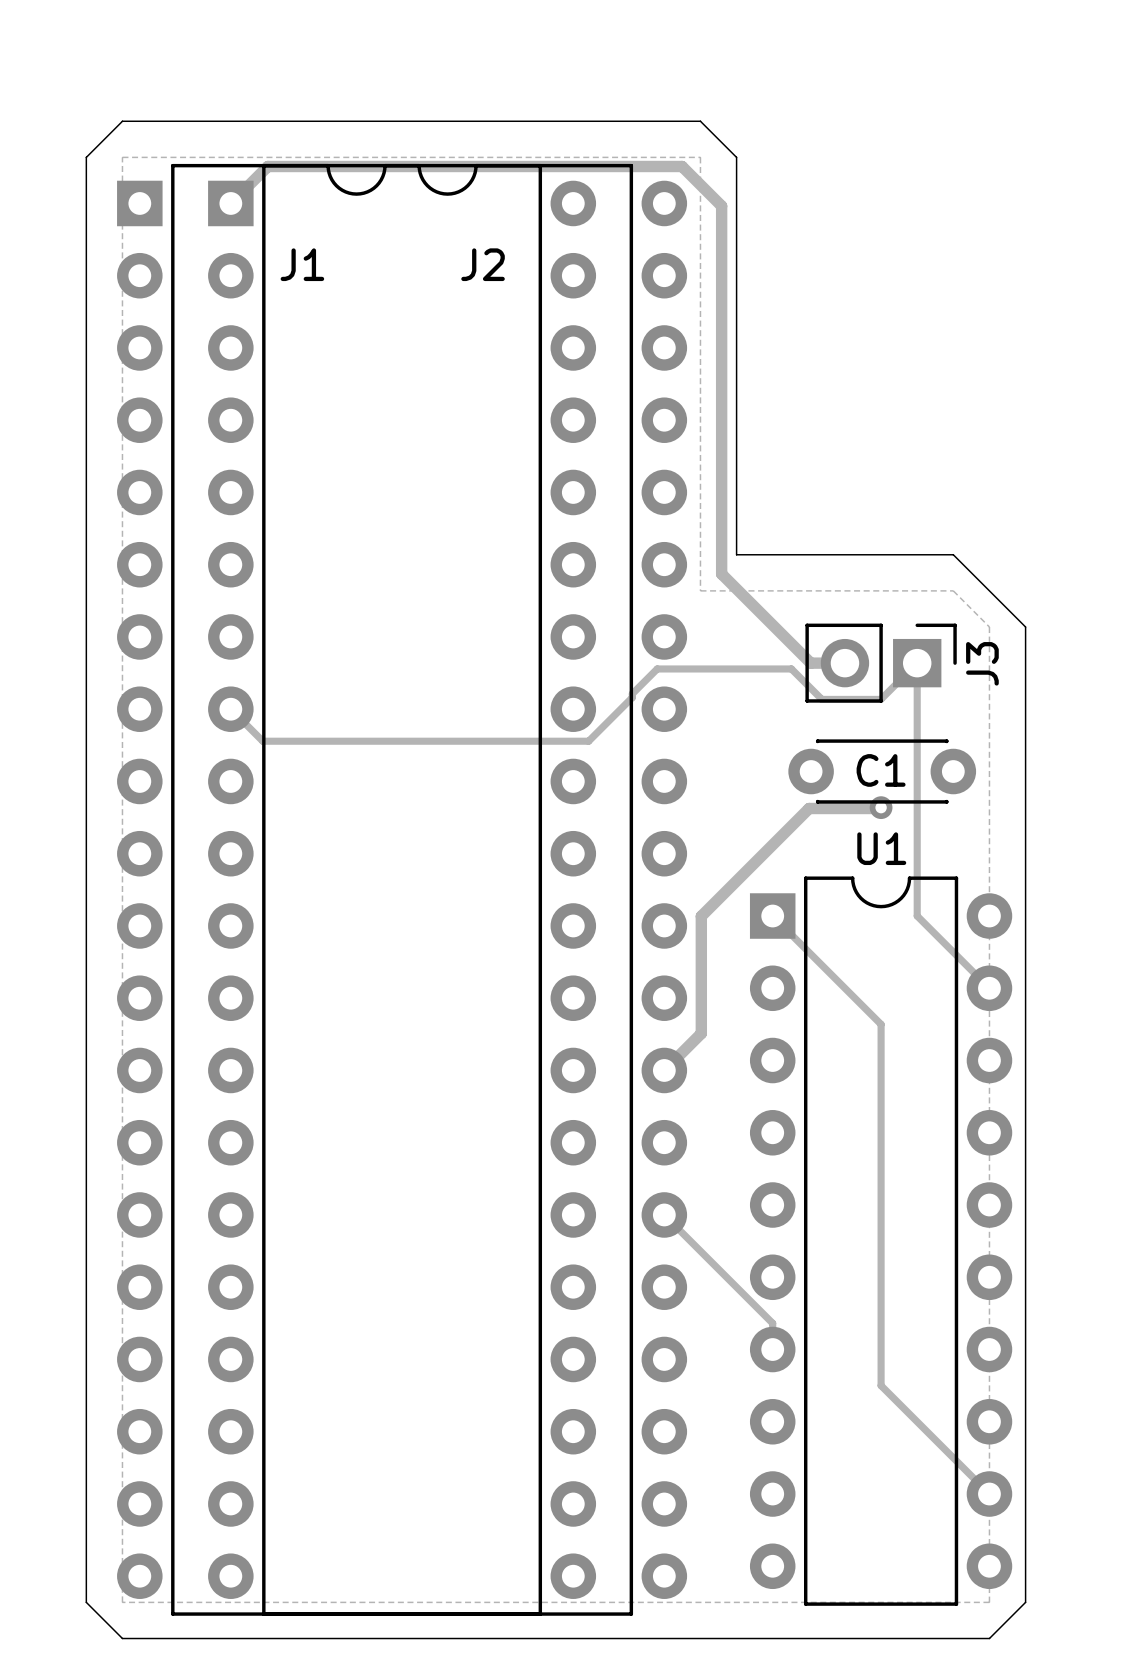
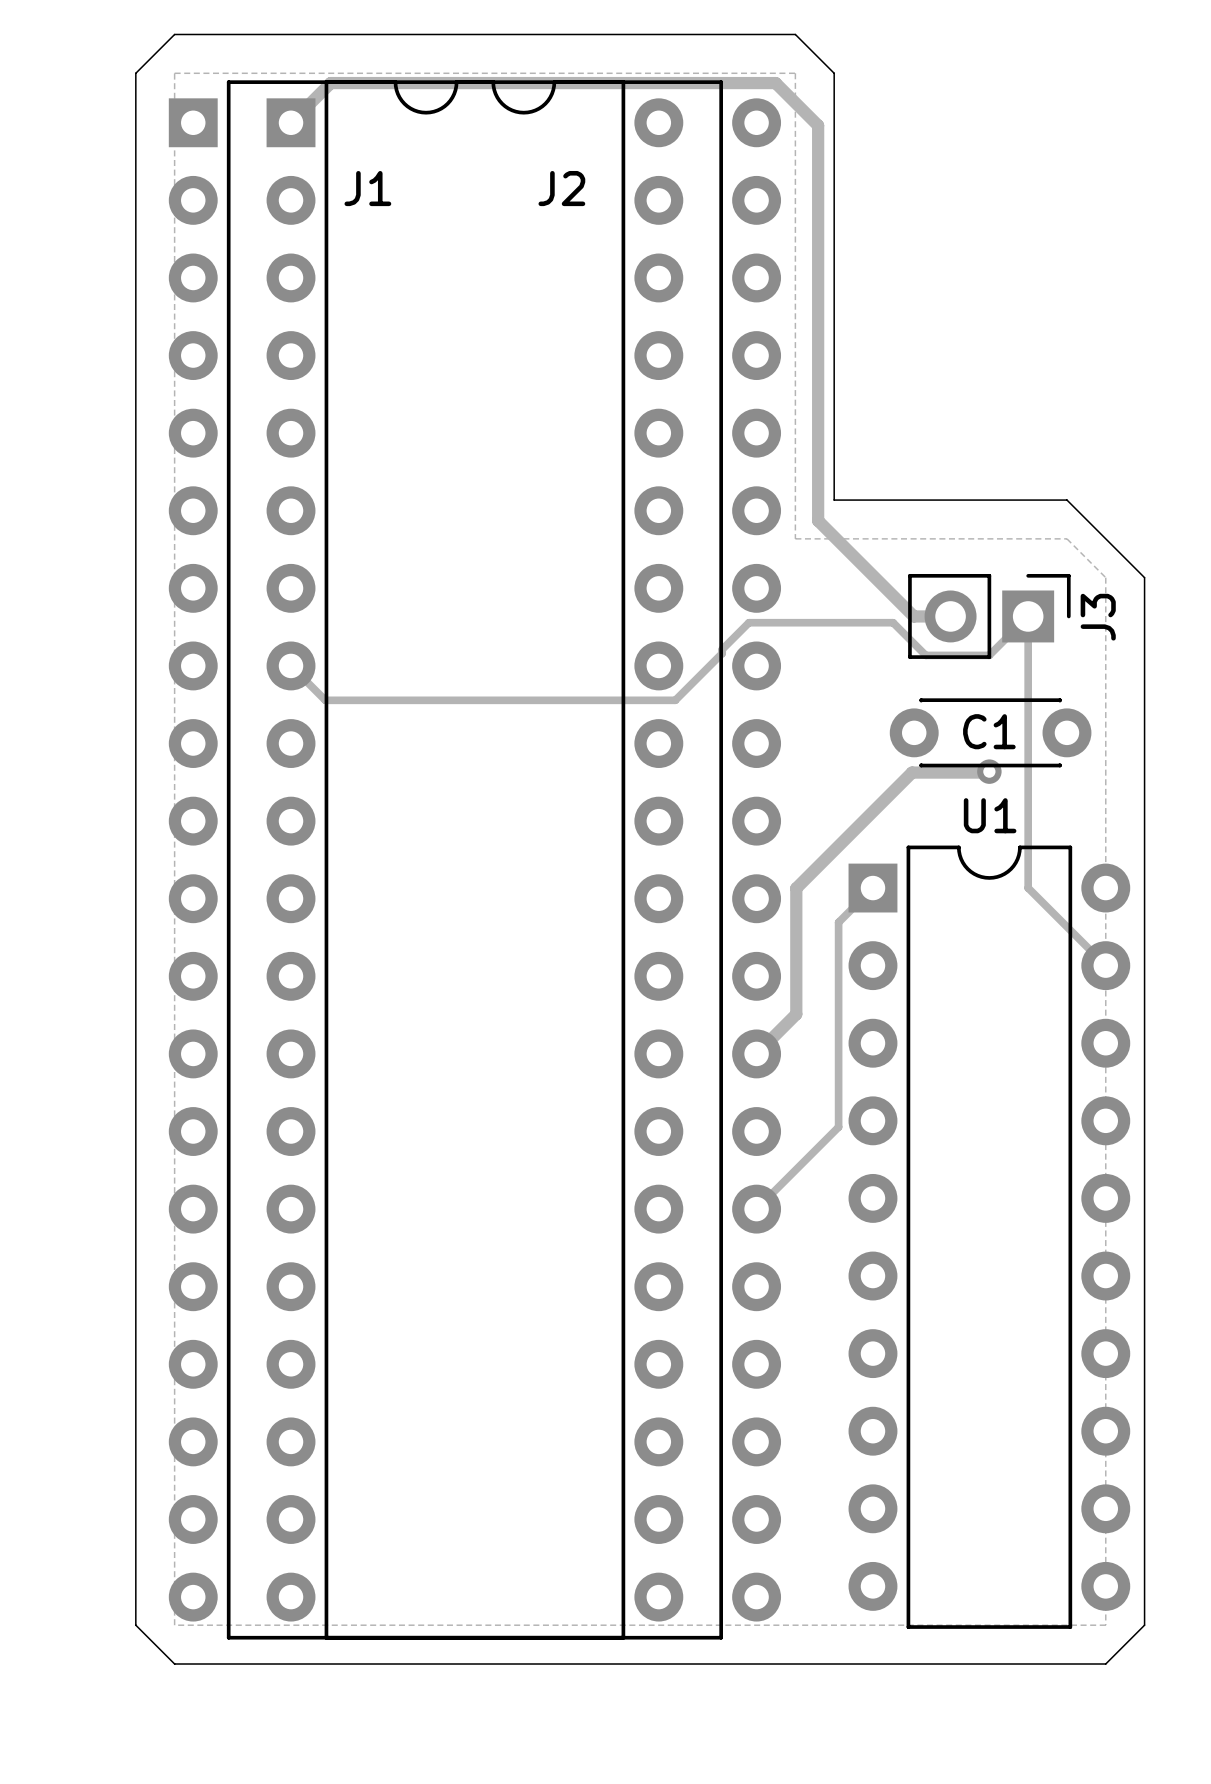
track: (772, 916) (881, 1024) (881, 1385) (989, 1494) -> (872, 888) (838, 922) (838, 1127) (756, 1209)
track: (664, 1214) (772, 1323) (772, 1349) -> none

